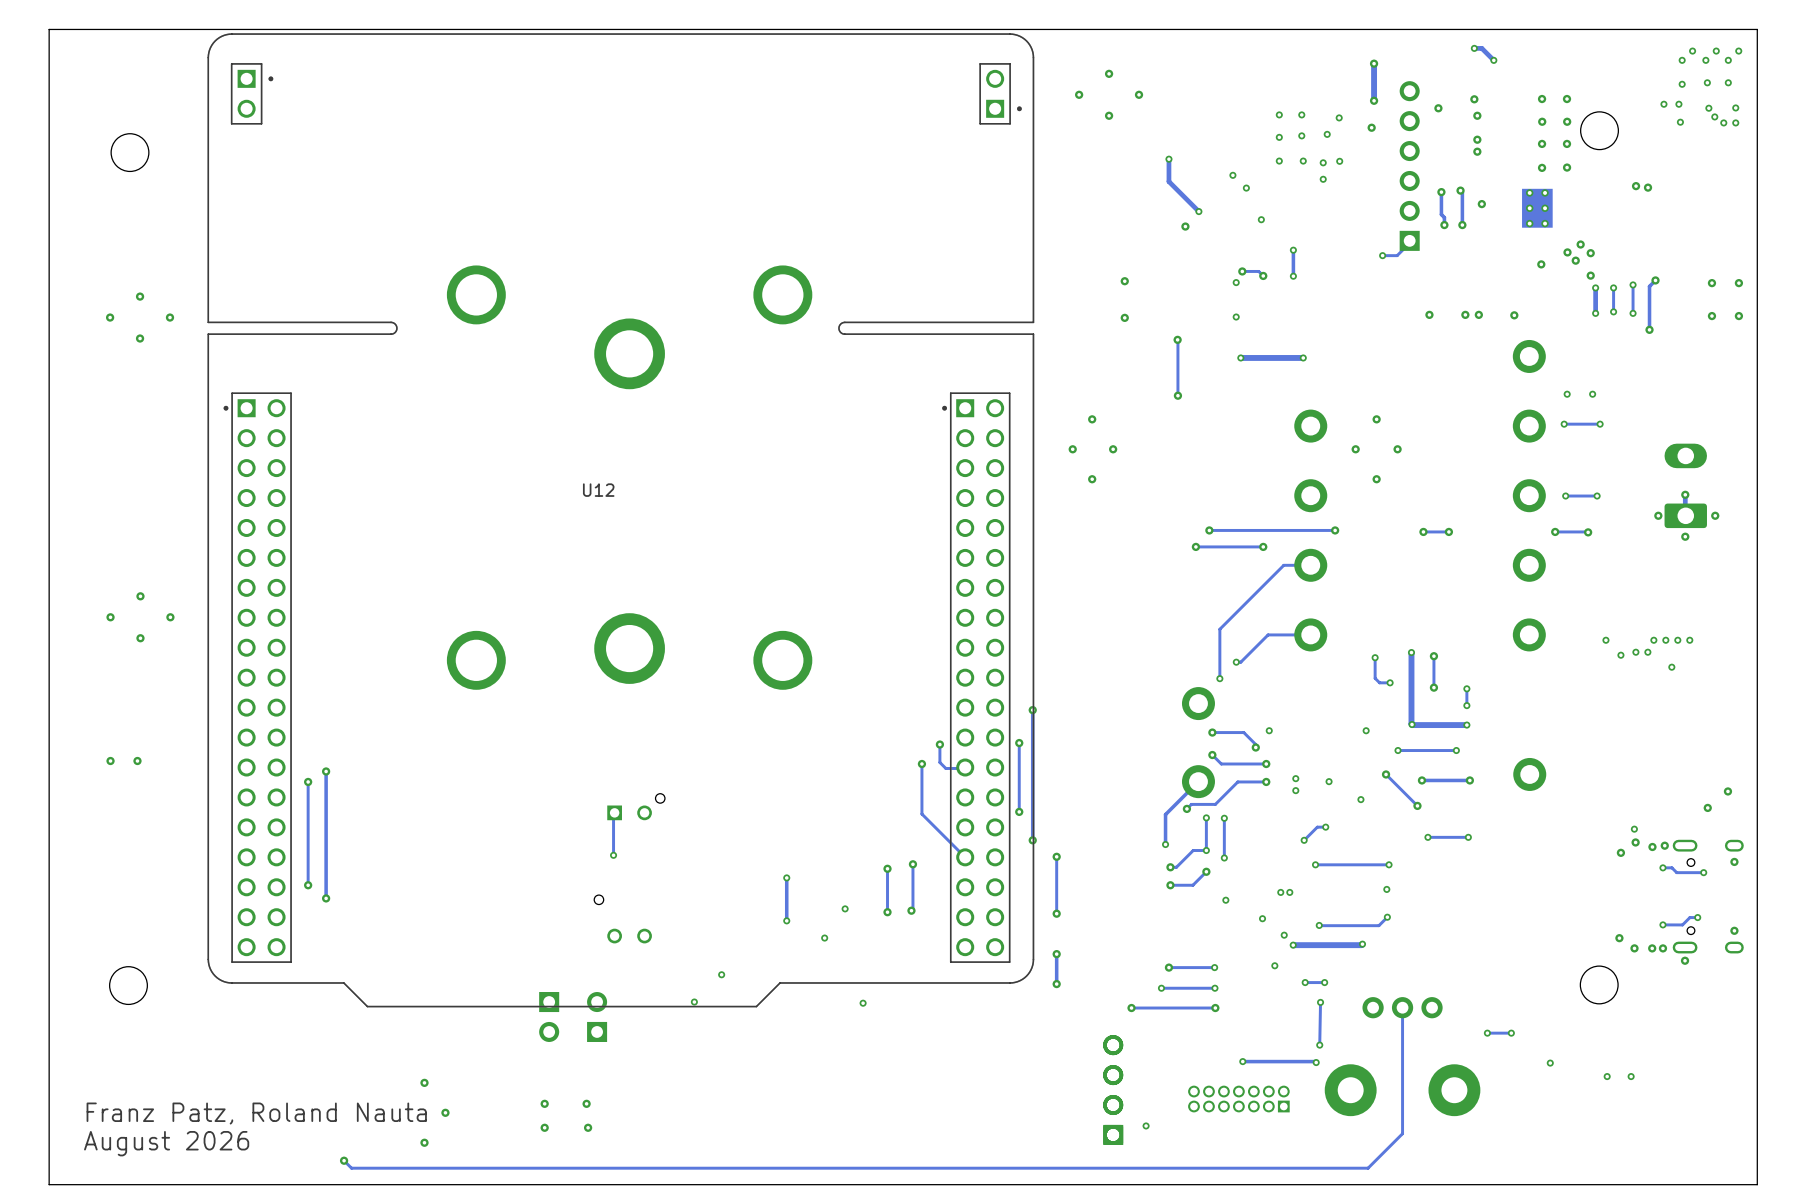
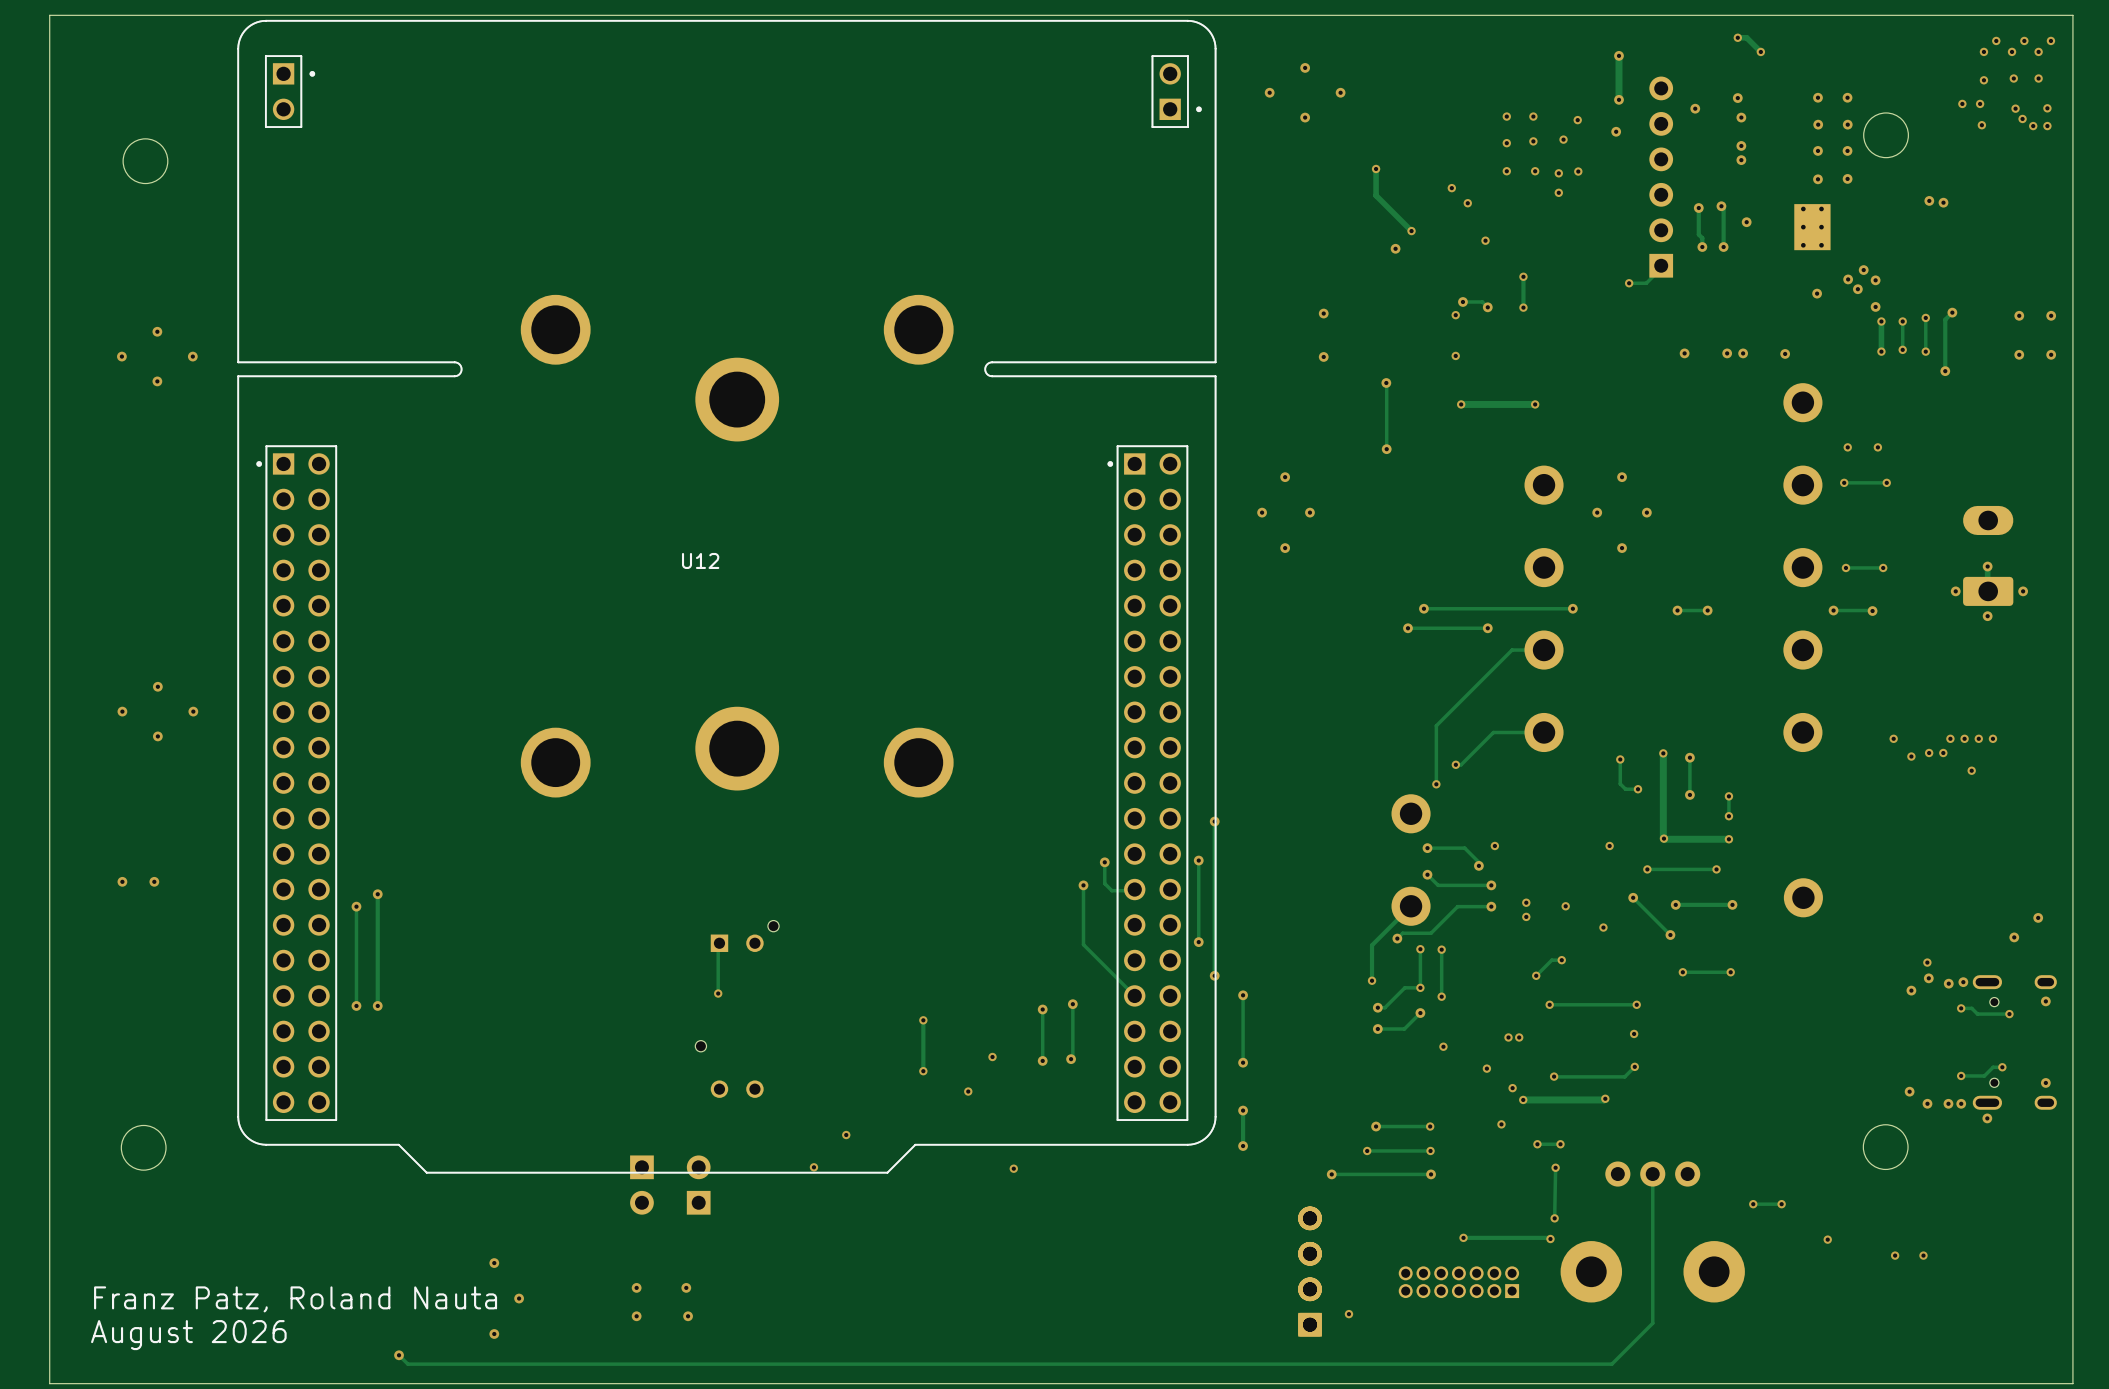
track: (308, 865) (308, 885) -> none
via: none -> (356, 1005)
track: (326, 865) (326, 898) -> none
via: none -> (377, 1005)
via: (308, 885) -> none
via: (326, 898) -> none

